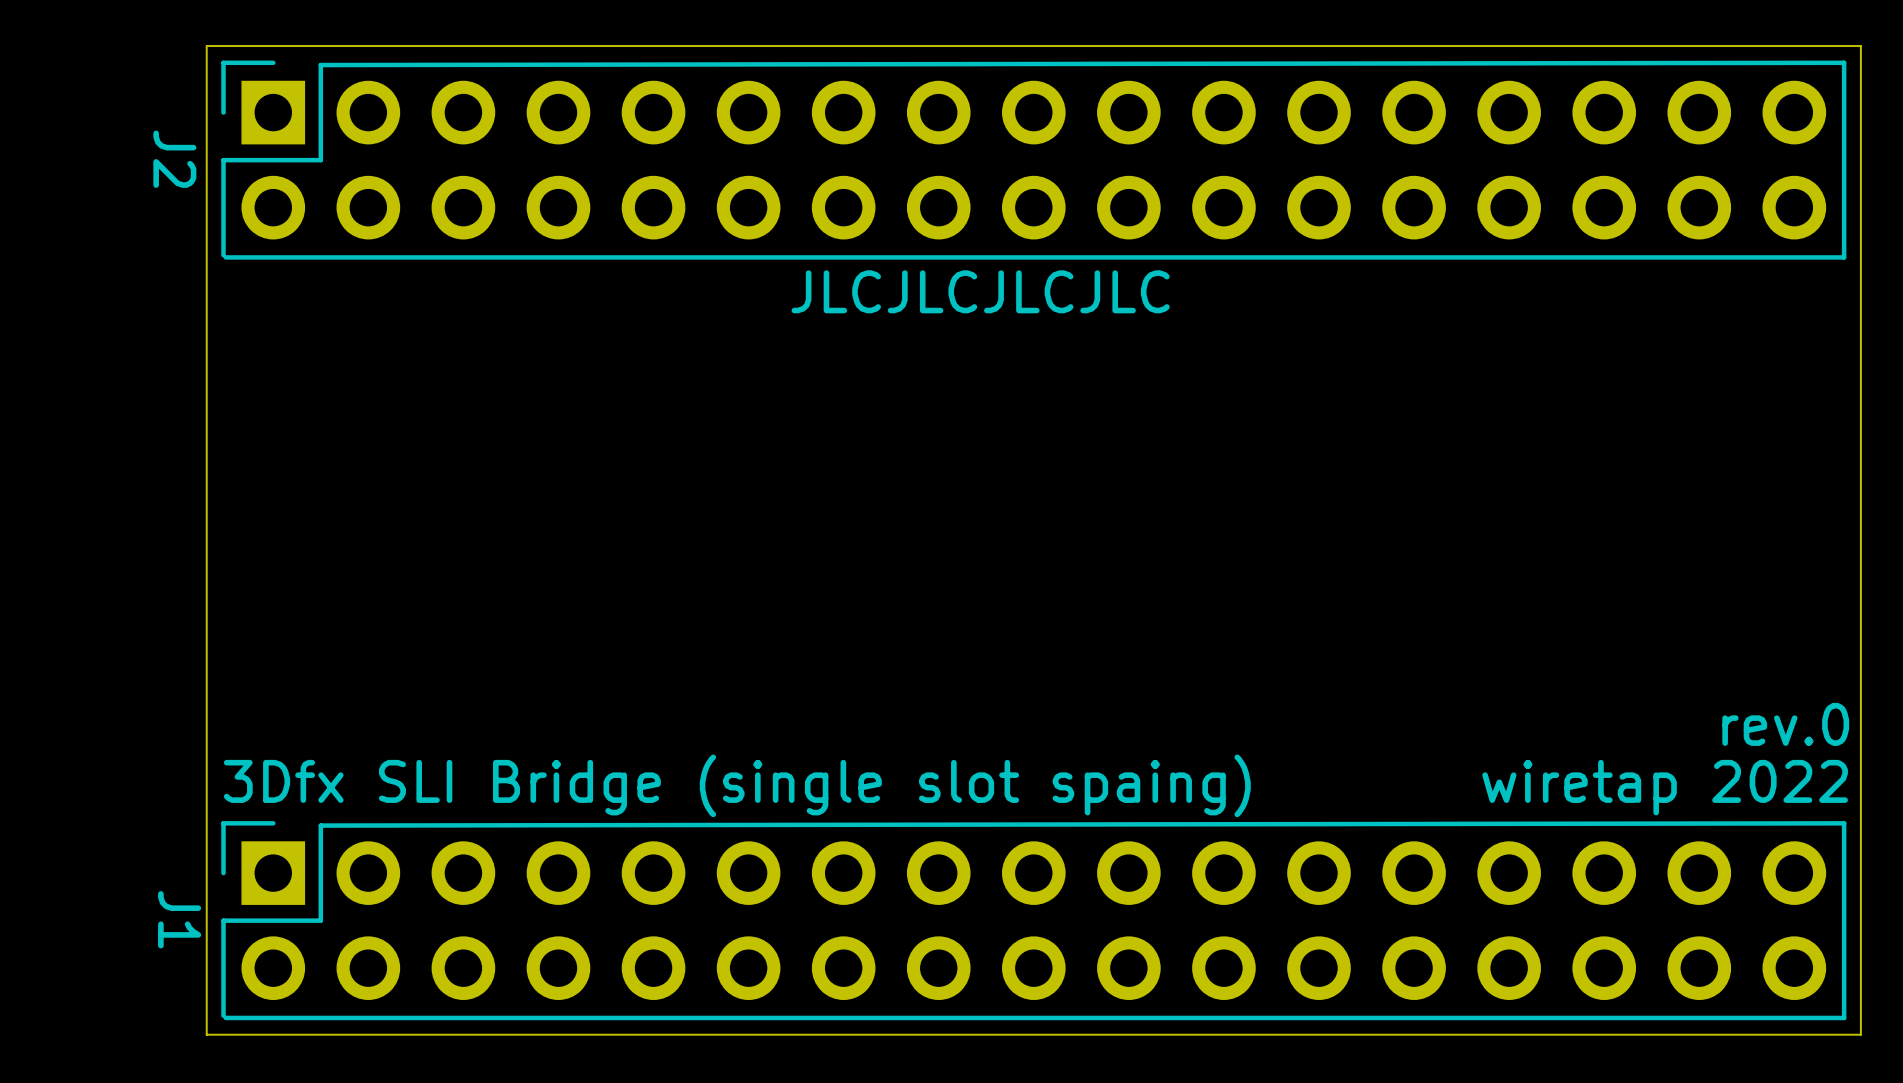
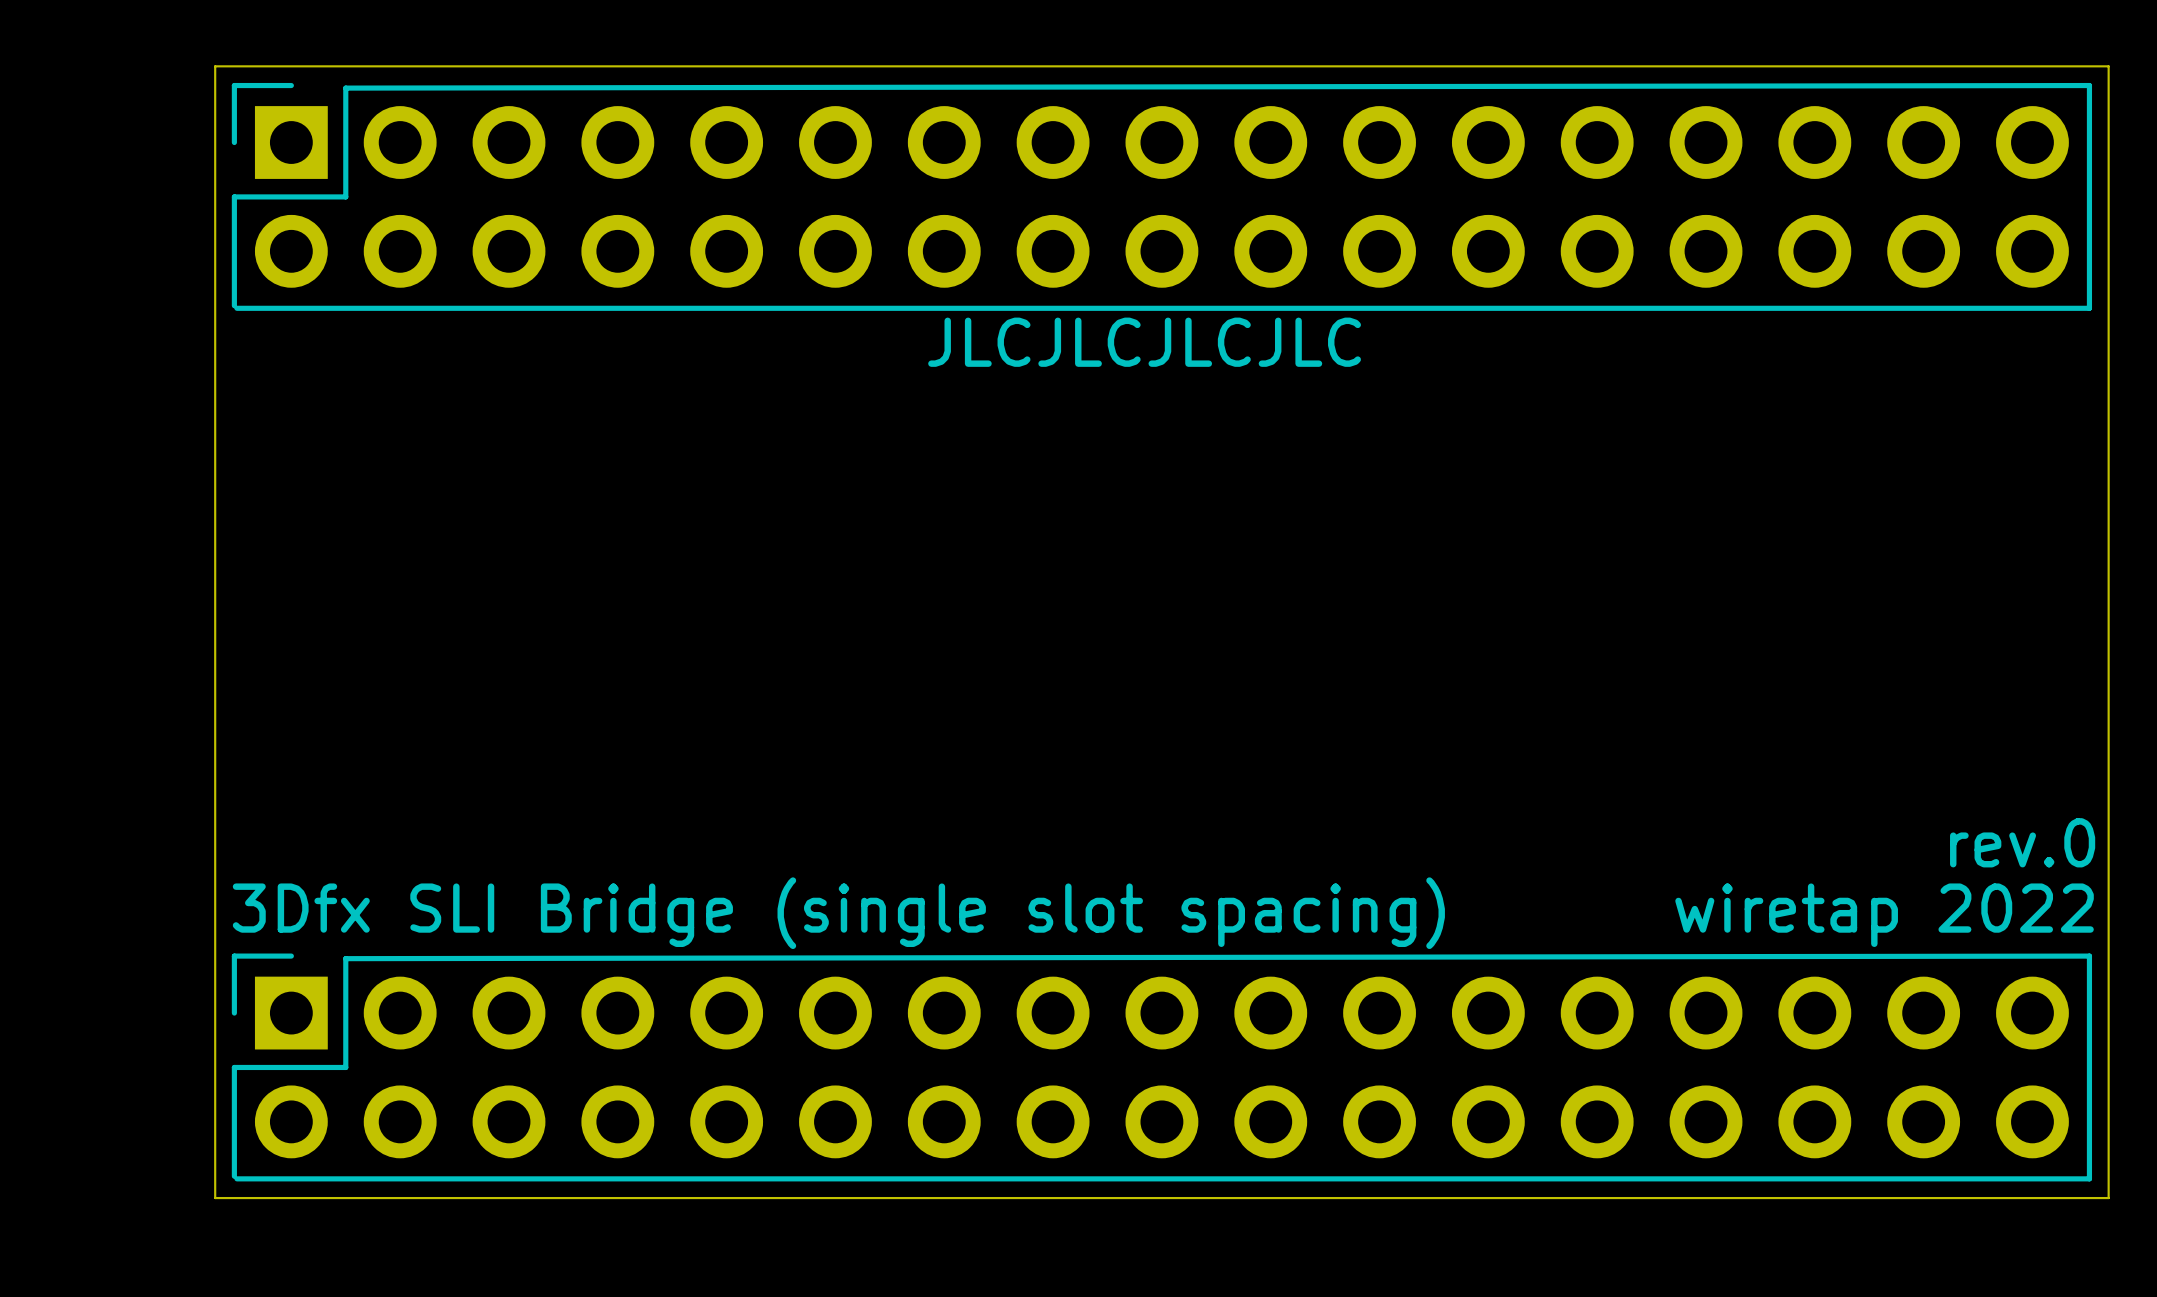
J2 name: J2 (174, 159) -> none
text position: JLCJLCJLCJLC (980, 291) -> JLCJLCJLCJLC (1144, 342)
text: 3Dfx SLI Bridge (single slot spaing) (737, 785) -> 3Dfx SLI Bridge (single slot spacing) (838, 913)
J1 name: J1 (179, 919) -> none

